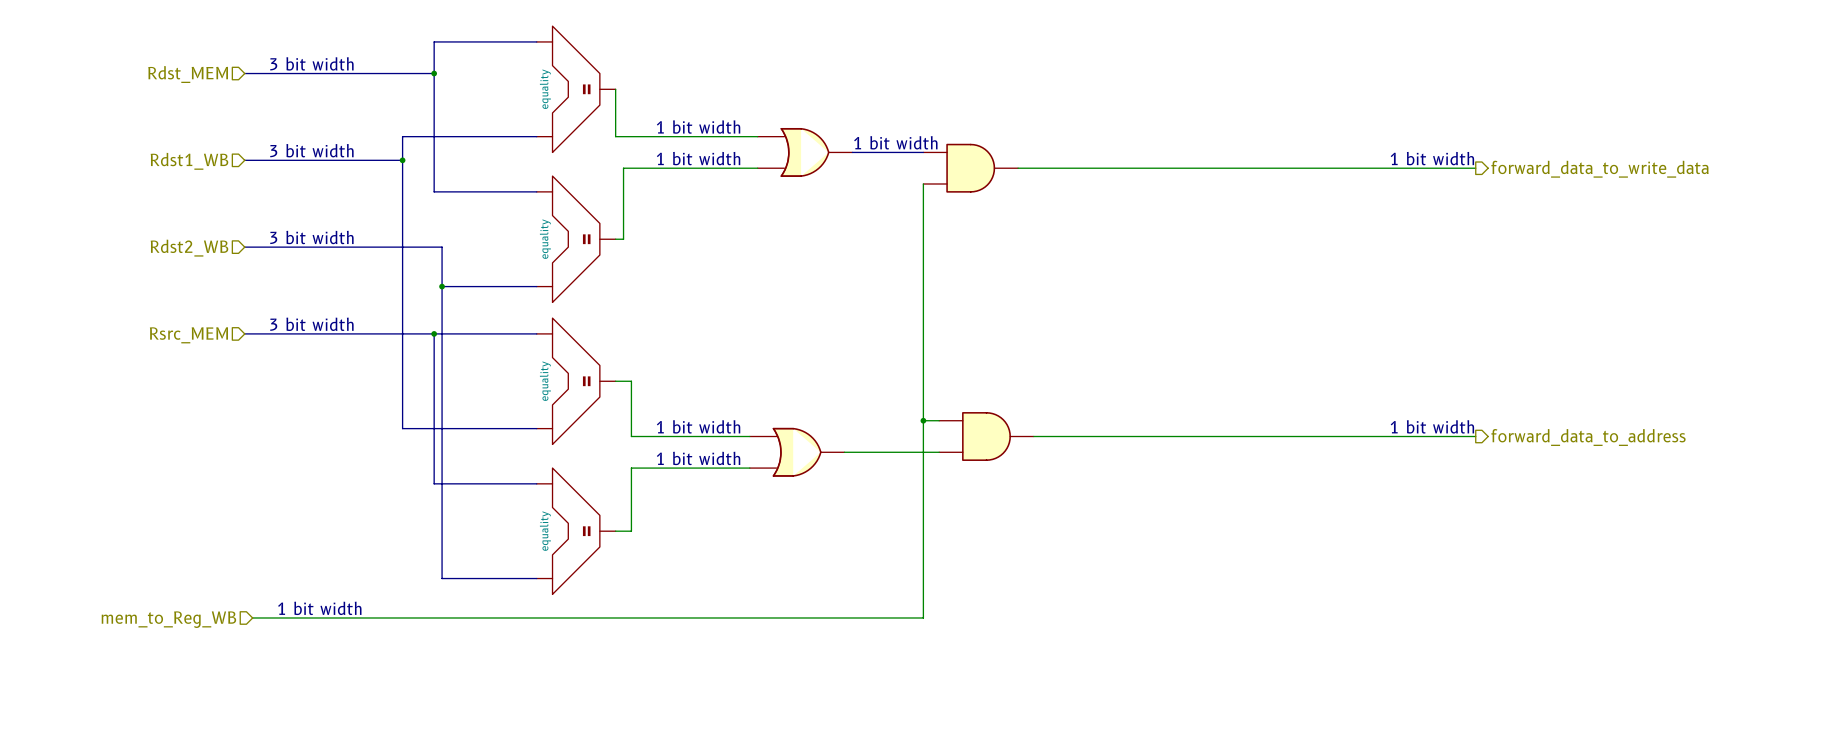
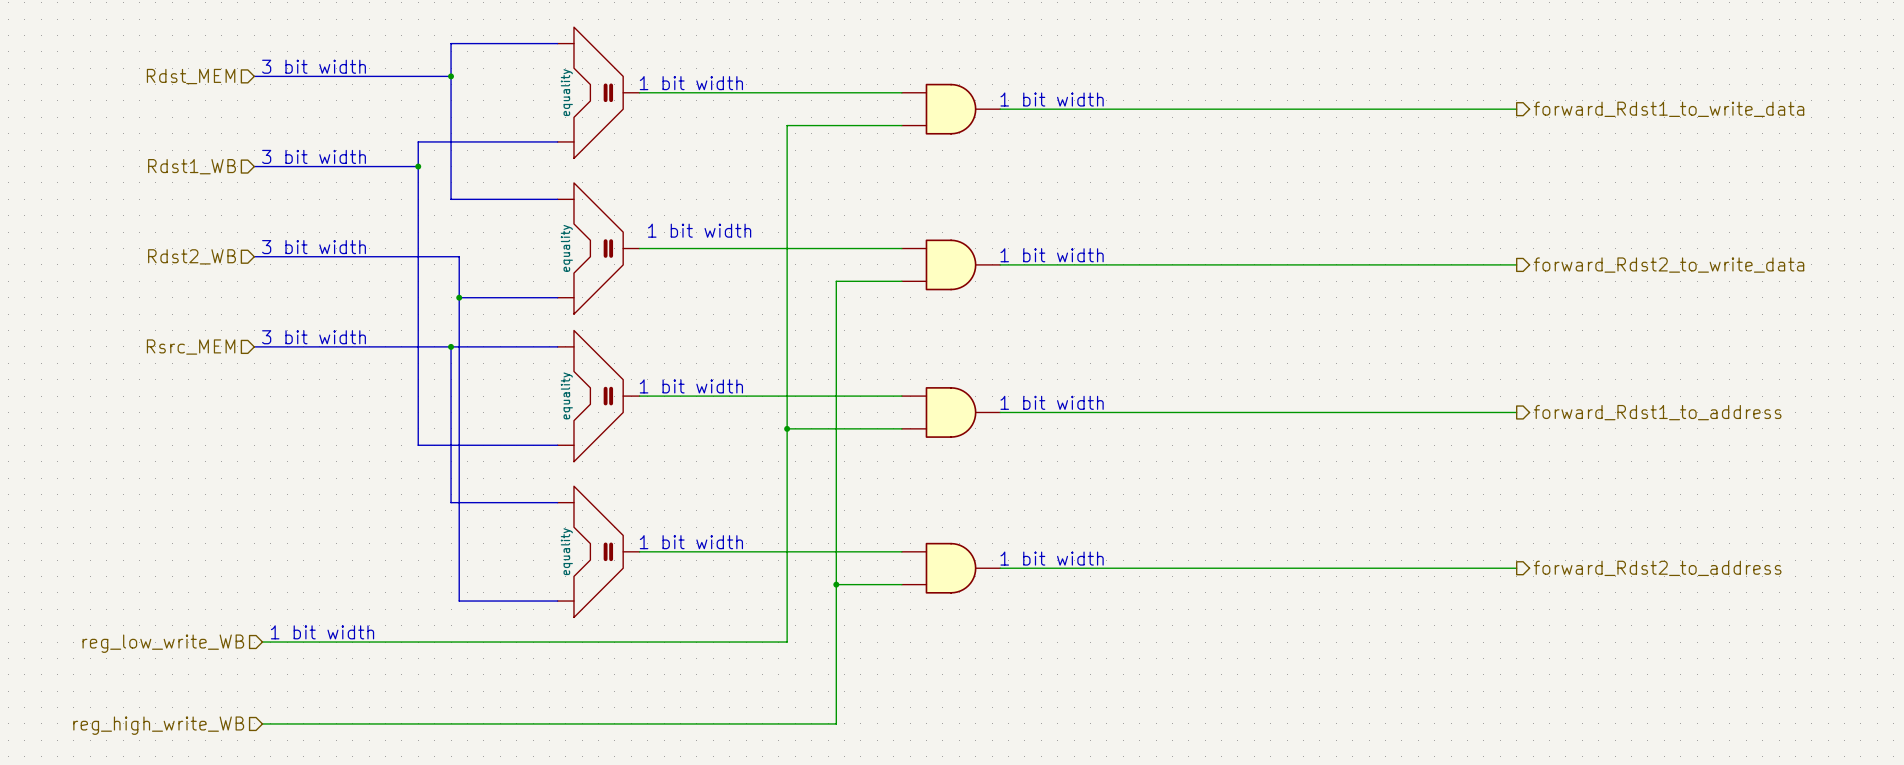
text: none -> 1 bit width (691, 83)
wire: (615, 89) (615, 136) (757, 136) -> (639, 92) (901, 92)
text: none -> 1 bit width (1052, 99)
part: none -> (951, 109)
wire: none -> (1000, 109) (1516, 109)
hierarchical label: none -> forward_Rdst1_to_write_data (1669, 109)
text: 1 bit width (698, 127) -> none
text: 1 bit width (895, 142) -> none
part: (805, 152) -> none
bus: (852, 152) (923, 152) -> none
text: 1 bit width (698, 158) -> none
text: 1 bit width (1432, 158) -> none
wire: (757, 168) (623, 168) (623, 239) -> (901, 248) (647, 248)
part: (970, 168) -> none
wire: (1018, 168) (1475, 168) -> none
hierarchical label: forward_data_to_write_data (1600, 169) -> none
wire: (923, 184) (923, 617) (757, 617) -> (901, 125) (787, 125) (787, 642)
text: none -> 1 bit width (699, 230)
text: none -> 1 bit width (1052, 255)
part: none -> (951, 264)
wire: none -> (1000, 264) (1516, 264)
hierarchical label: none -> forward_Rdst2_to_write_data (1669, 265)
wire: none -> (901, 281) (836, 281) (836, 723) (262, 723)
text: none -> 1 bit width (691, 386)
wire: (631, 381) (631, 436) (749, 436) -> (655, 396) (901, 396)
text: none -> 1 bit width (1052, 402)
part: none -> (951, 412)
wire: none -> (1000, 412) (1516, 412)
hierarchical label: none -> forward_Rdst1_to_address (1657, 412)
wire: none -> (787, 428) (901, 428)
junction: none -> (787, 428)
wire: (923, 420) (939, 420) -> none
junction: (923, 420) -> none
text: 1 bit width (698, 426) -> none
text: 1 bit width (1432, 426) -> none
part: (986, 436) -> none
wire: (1033, 436) (1475, 436) -> none
hierarchical label: forward_data_to_address (1588, 437) -> none
part: (797, 452) -> none
wire: (844, 452) (939, 452) -> none
text: 1 bit width (698, 458) -> none
wire: (749, 468) (631, 468) (631, 531) -> (901, 551) (655, 551)
text: none -> 1 bit width (691, 542)
text: none -> 1 bit width (1052, 558)
part: none -> (951, 568)
wire: none -> (1000, 568) (1516, 568)
hierarchical label: none -> forward_Rdst2_to_address (1657, 568)
wire: none -> (836, 584) (901, 584)
junction: none -> (836, 584)
hierarchical label: mem_to_Reg_WB (168, 619) -> reg_low_write_WB (163, 643)
hierarchical label: none -> reg_high_write_WB (158, 725)

